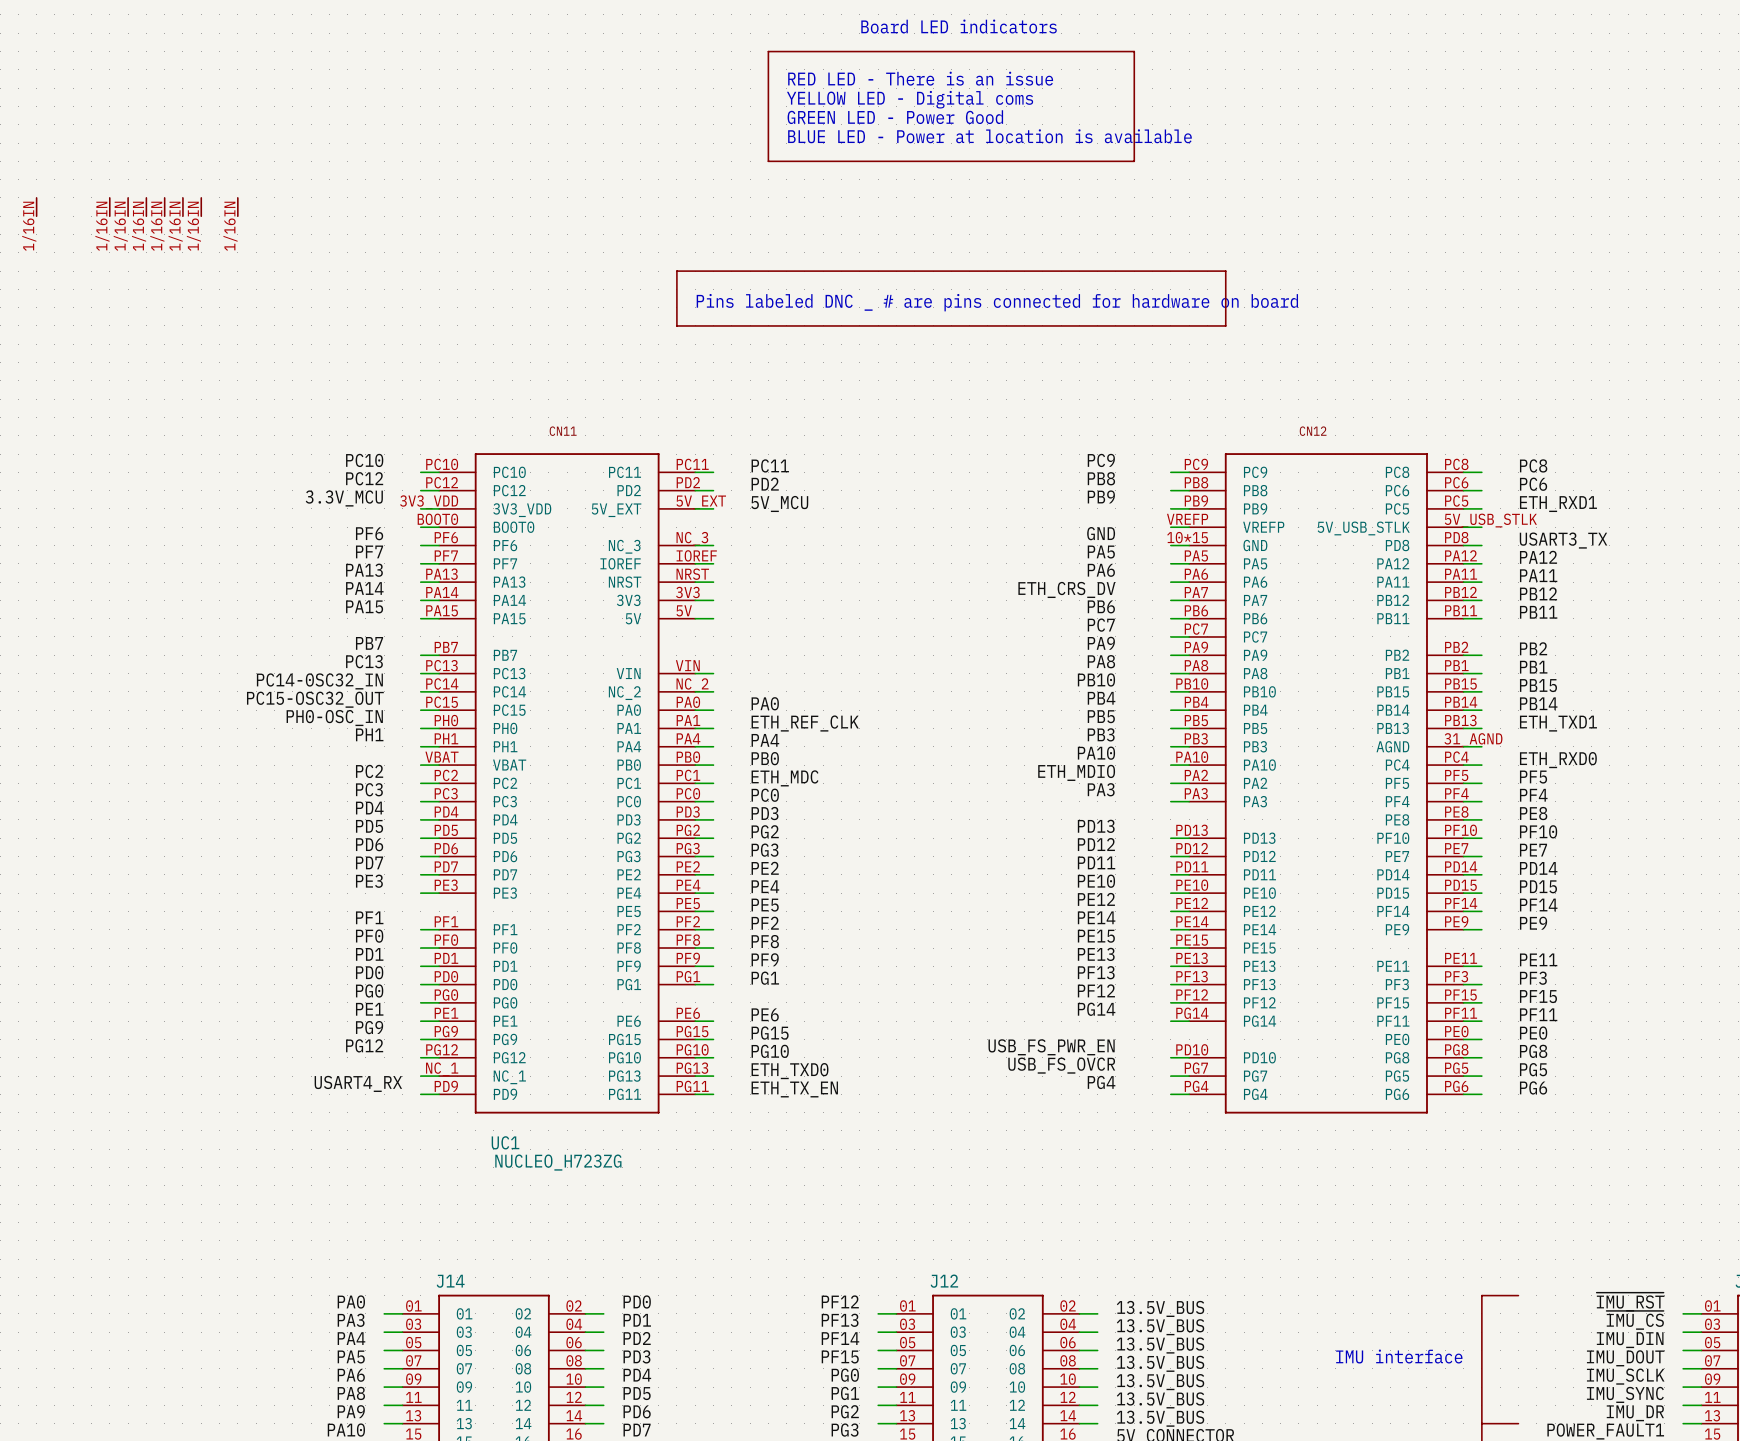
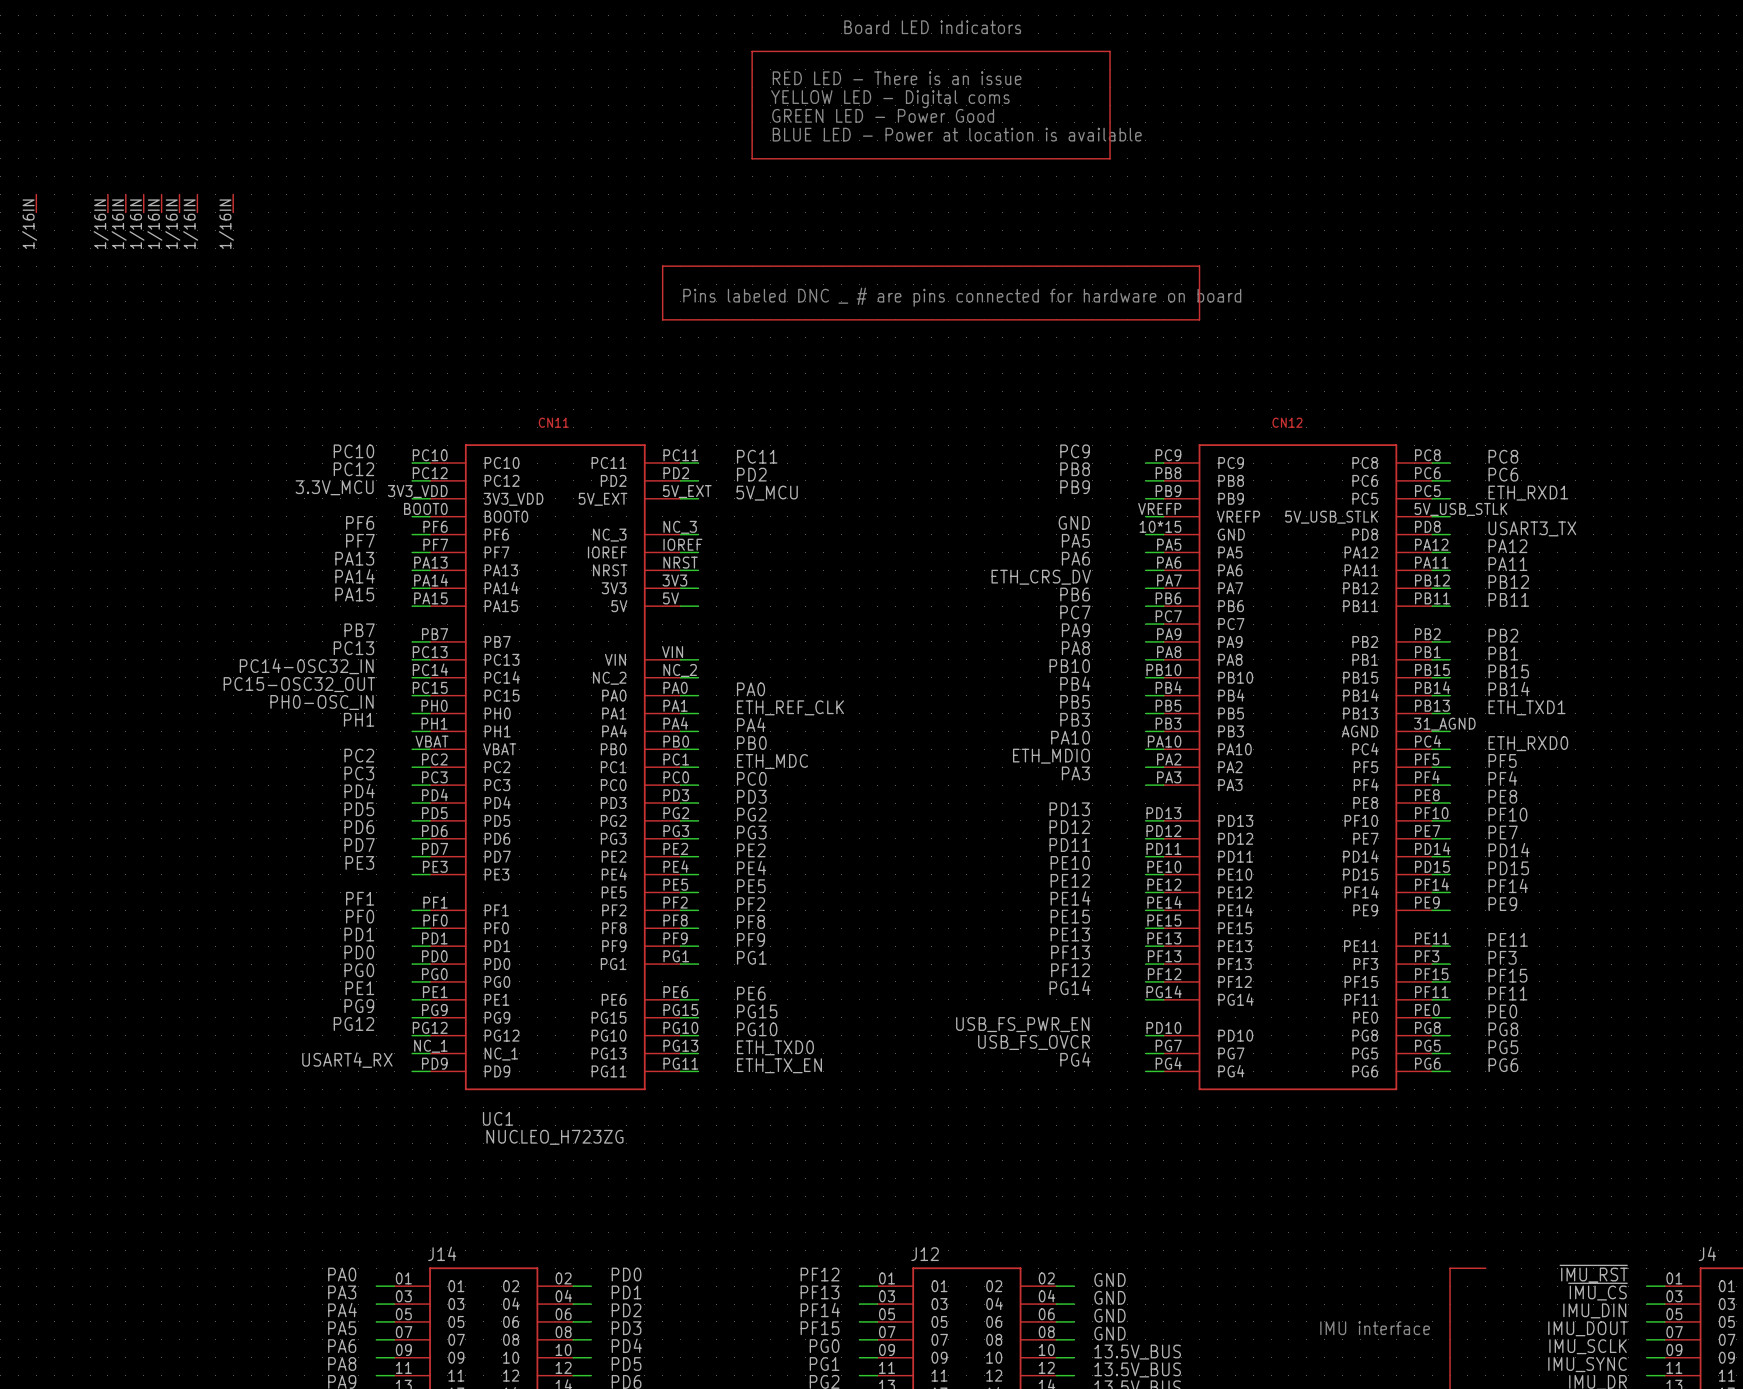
label: 13.5V_BUS (1160, 1308) -> GND (1109, 1279)
label: 13.5V_BUS (1160, 1327) -> GND (1109, 1297)
label: 13.5V_BUS (1160, 1345) -> GND (1109, 1315)
label: 13.5V_BUS (1160, 1363) -> GND (1109, 1333)

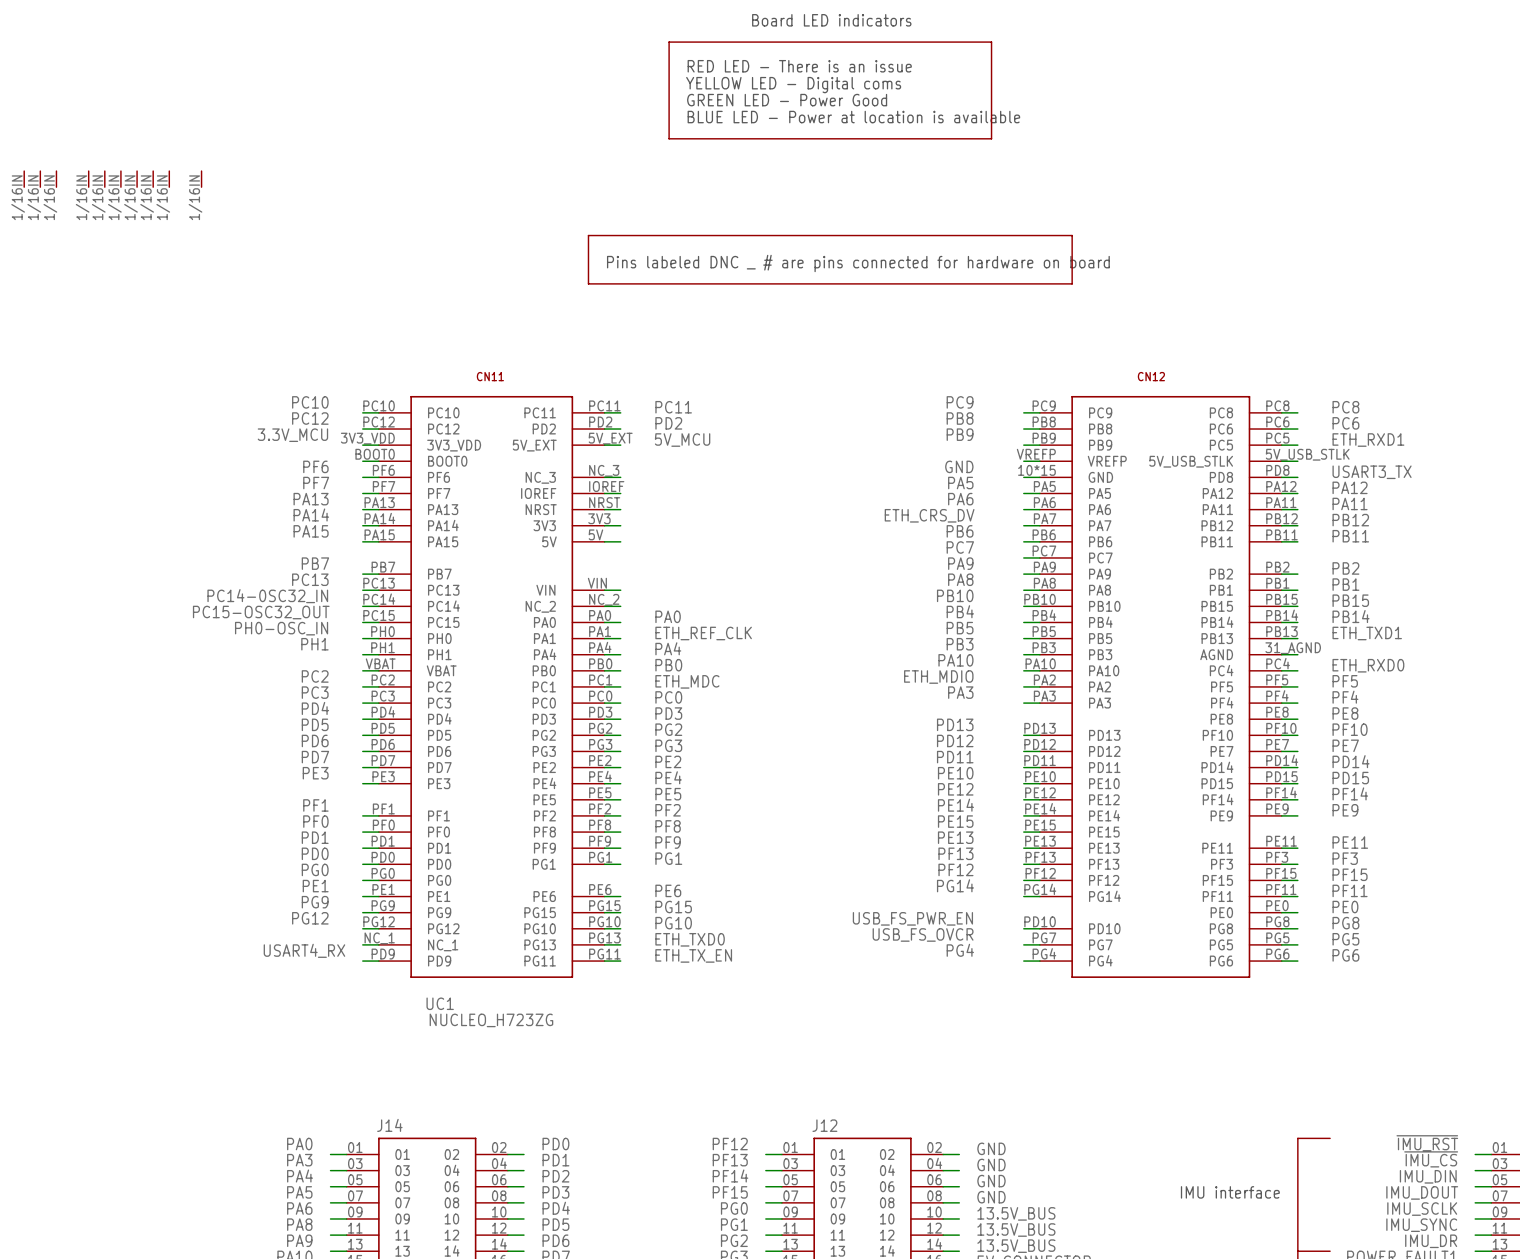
part: none -> (40, 179)
part: none -> (56, 179)

